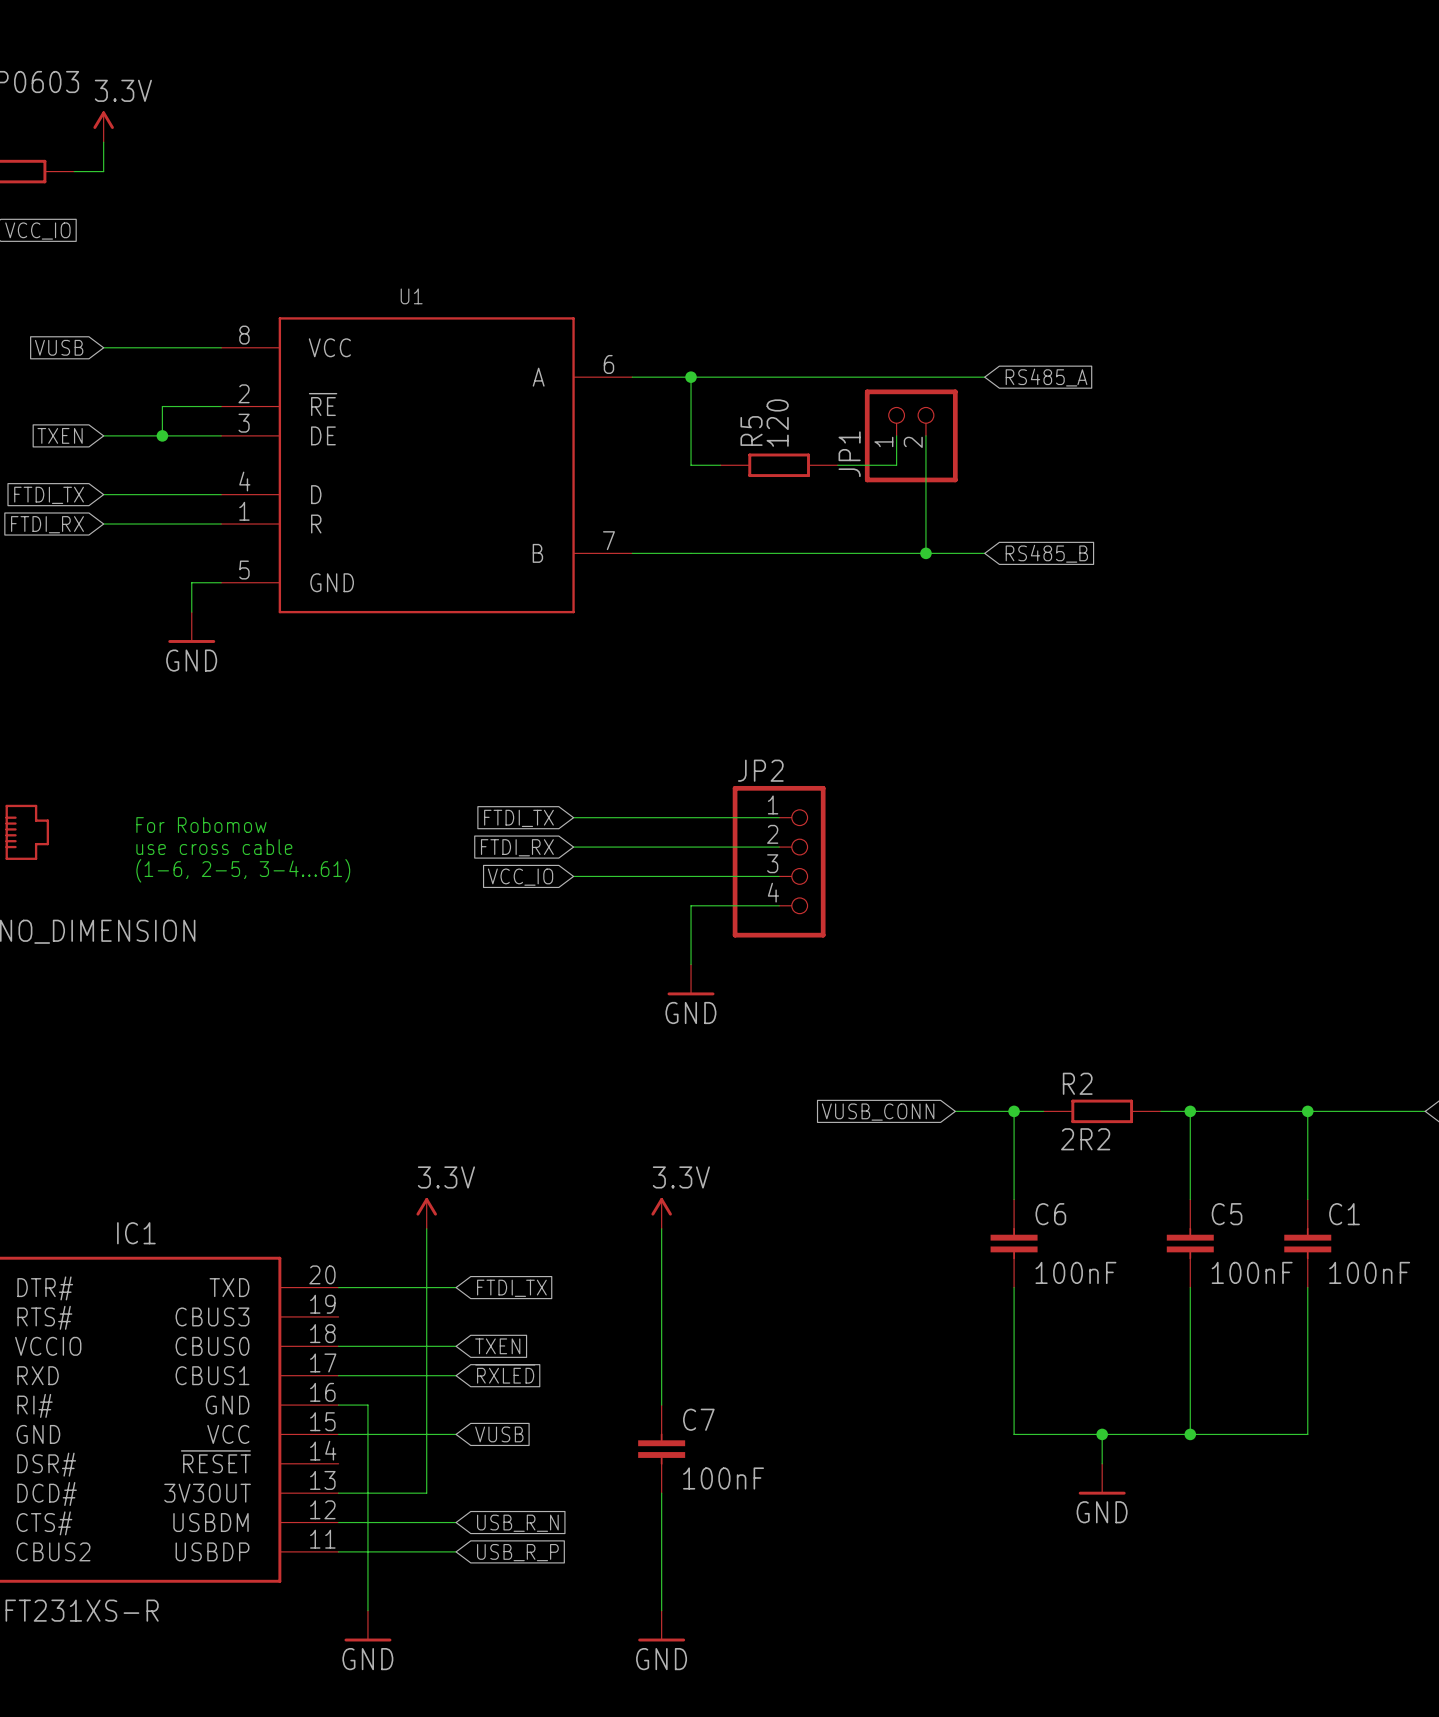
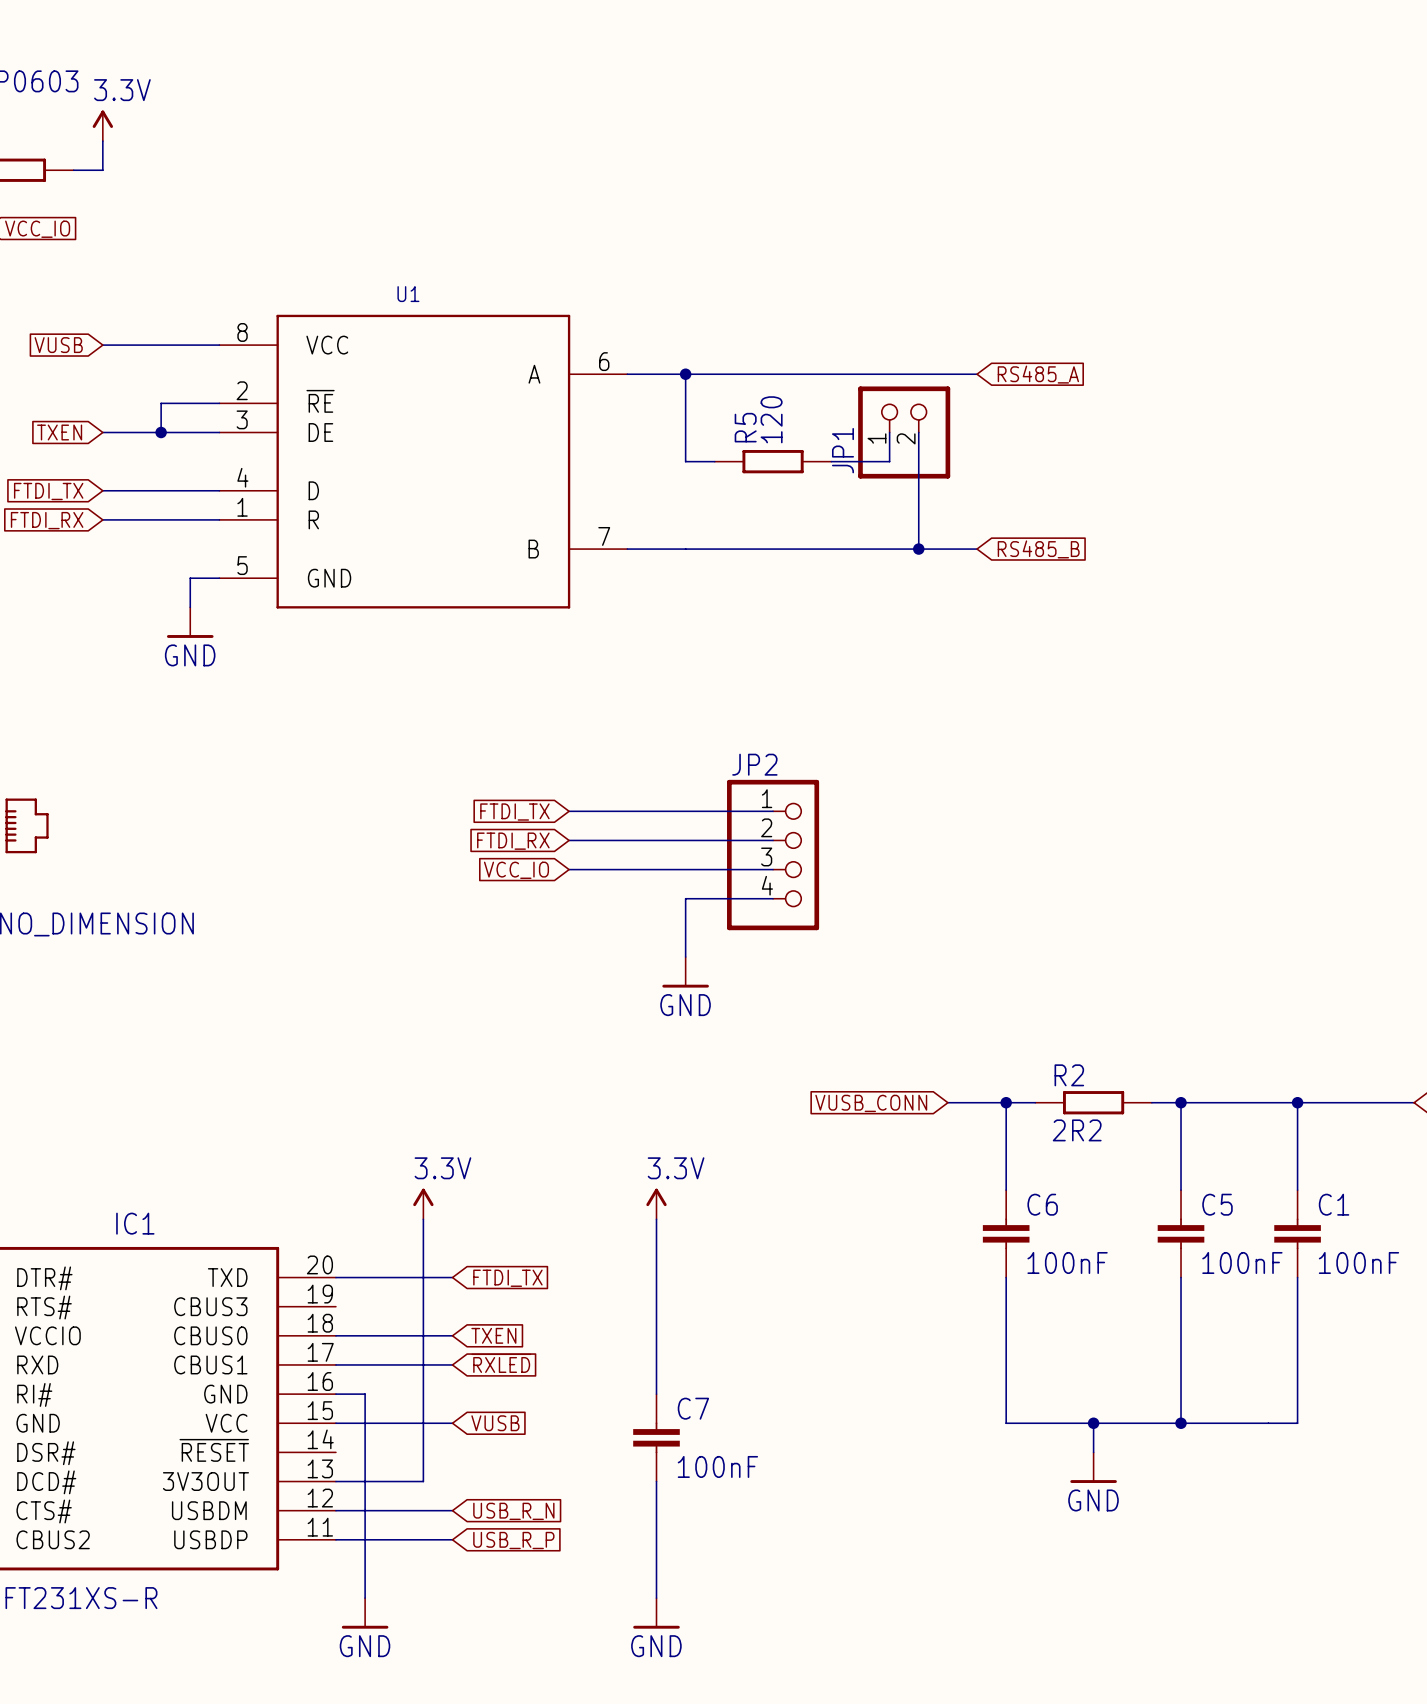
text: For Robomow (201, 825) -> none
text: use cross cable (214, 847) -> none
text: (1-6, 2-5, 3-4...61) (243, 870) -> none

